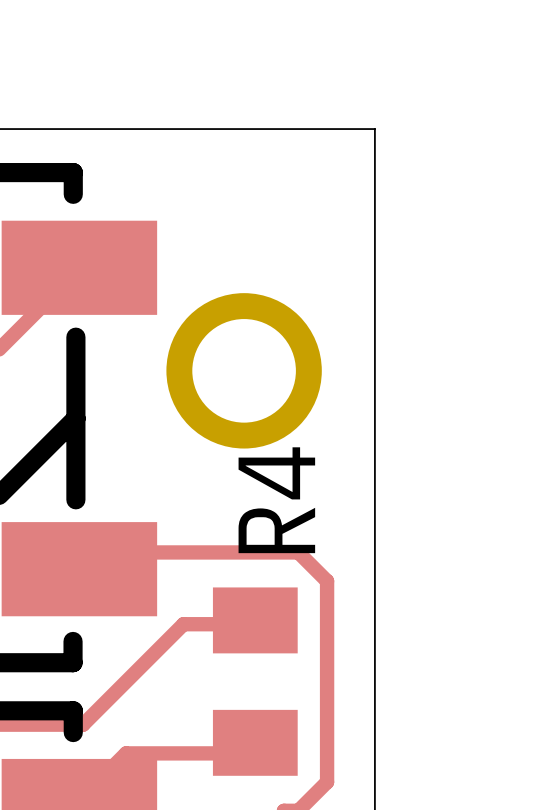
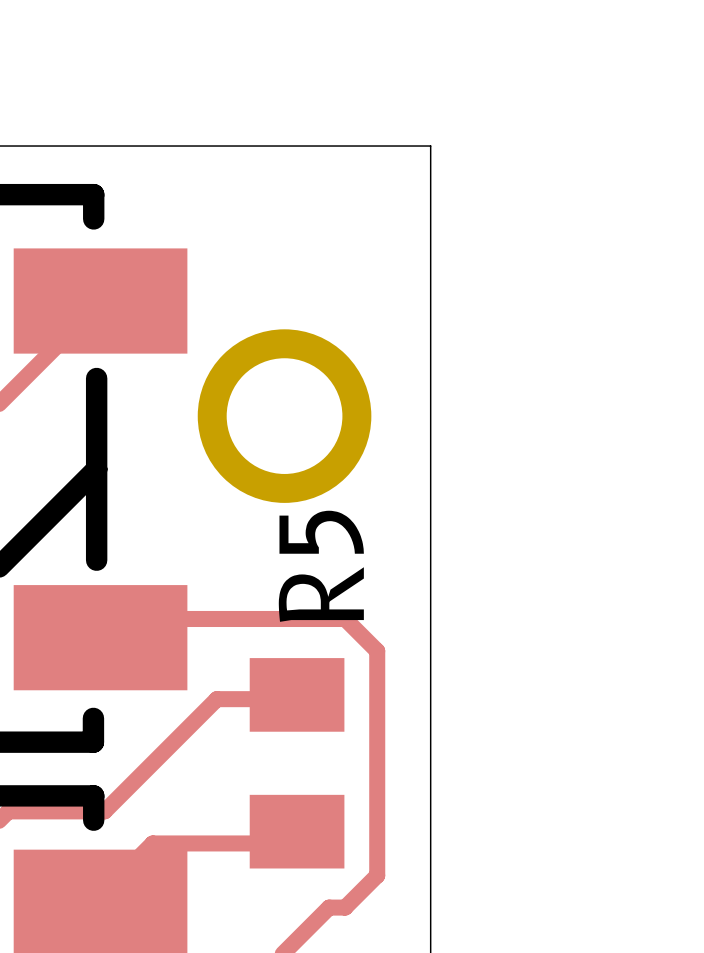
R4 name: R4 (276, 500) -> R5 (321, 566)

